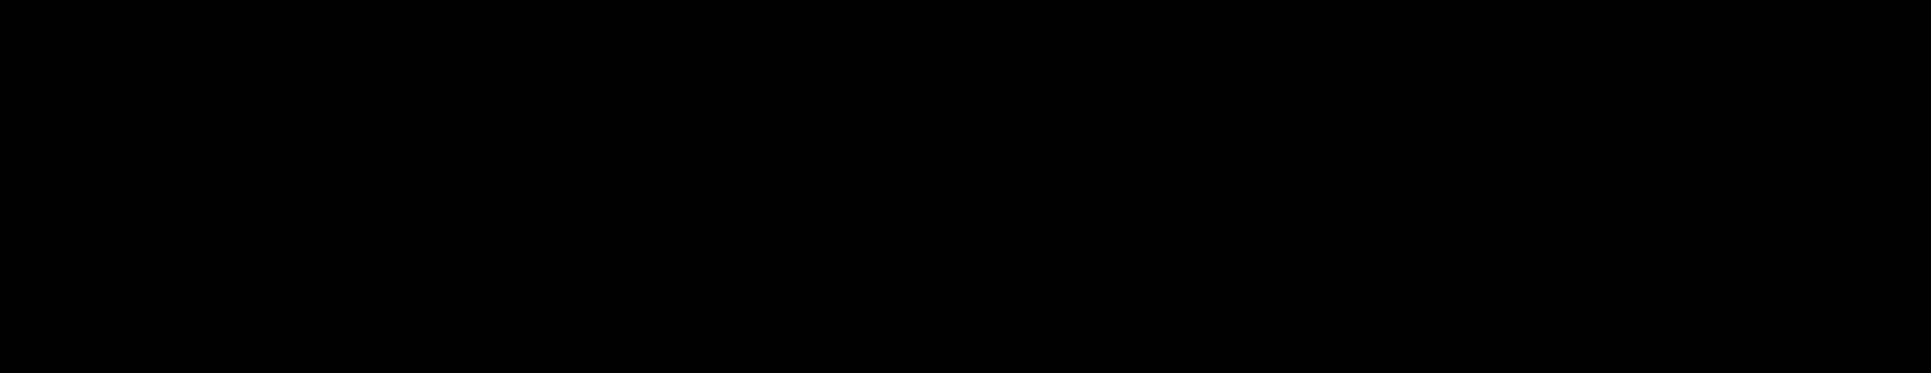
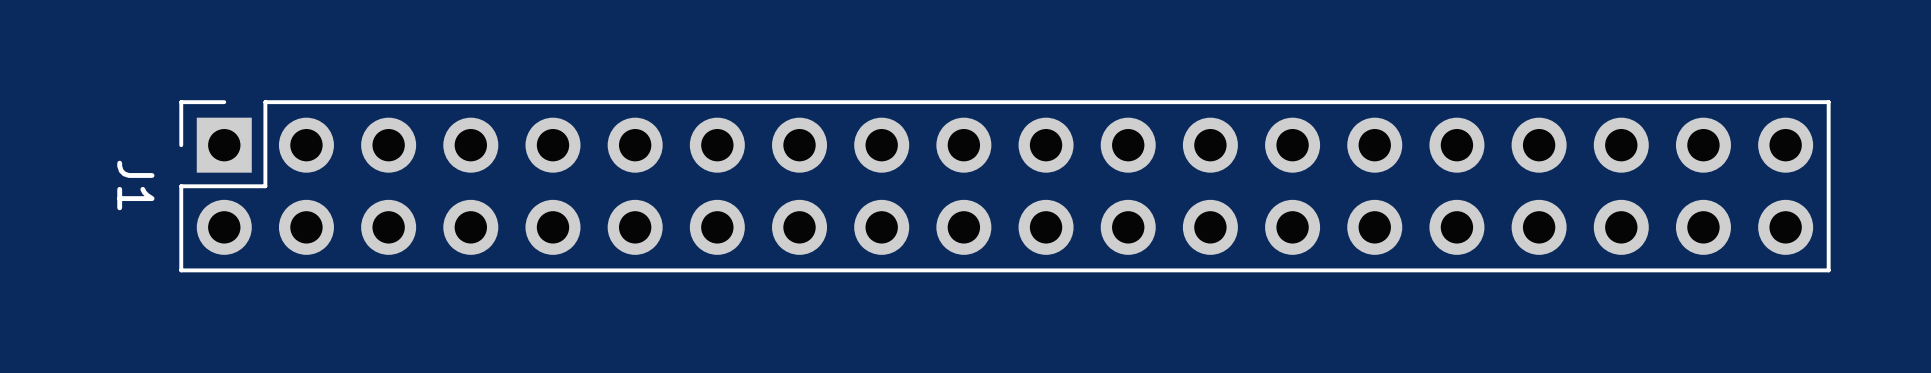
J1: none -> (1004, 186)

